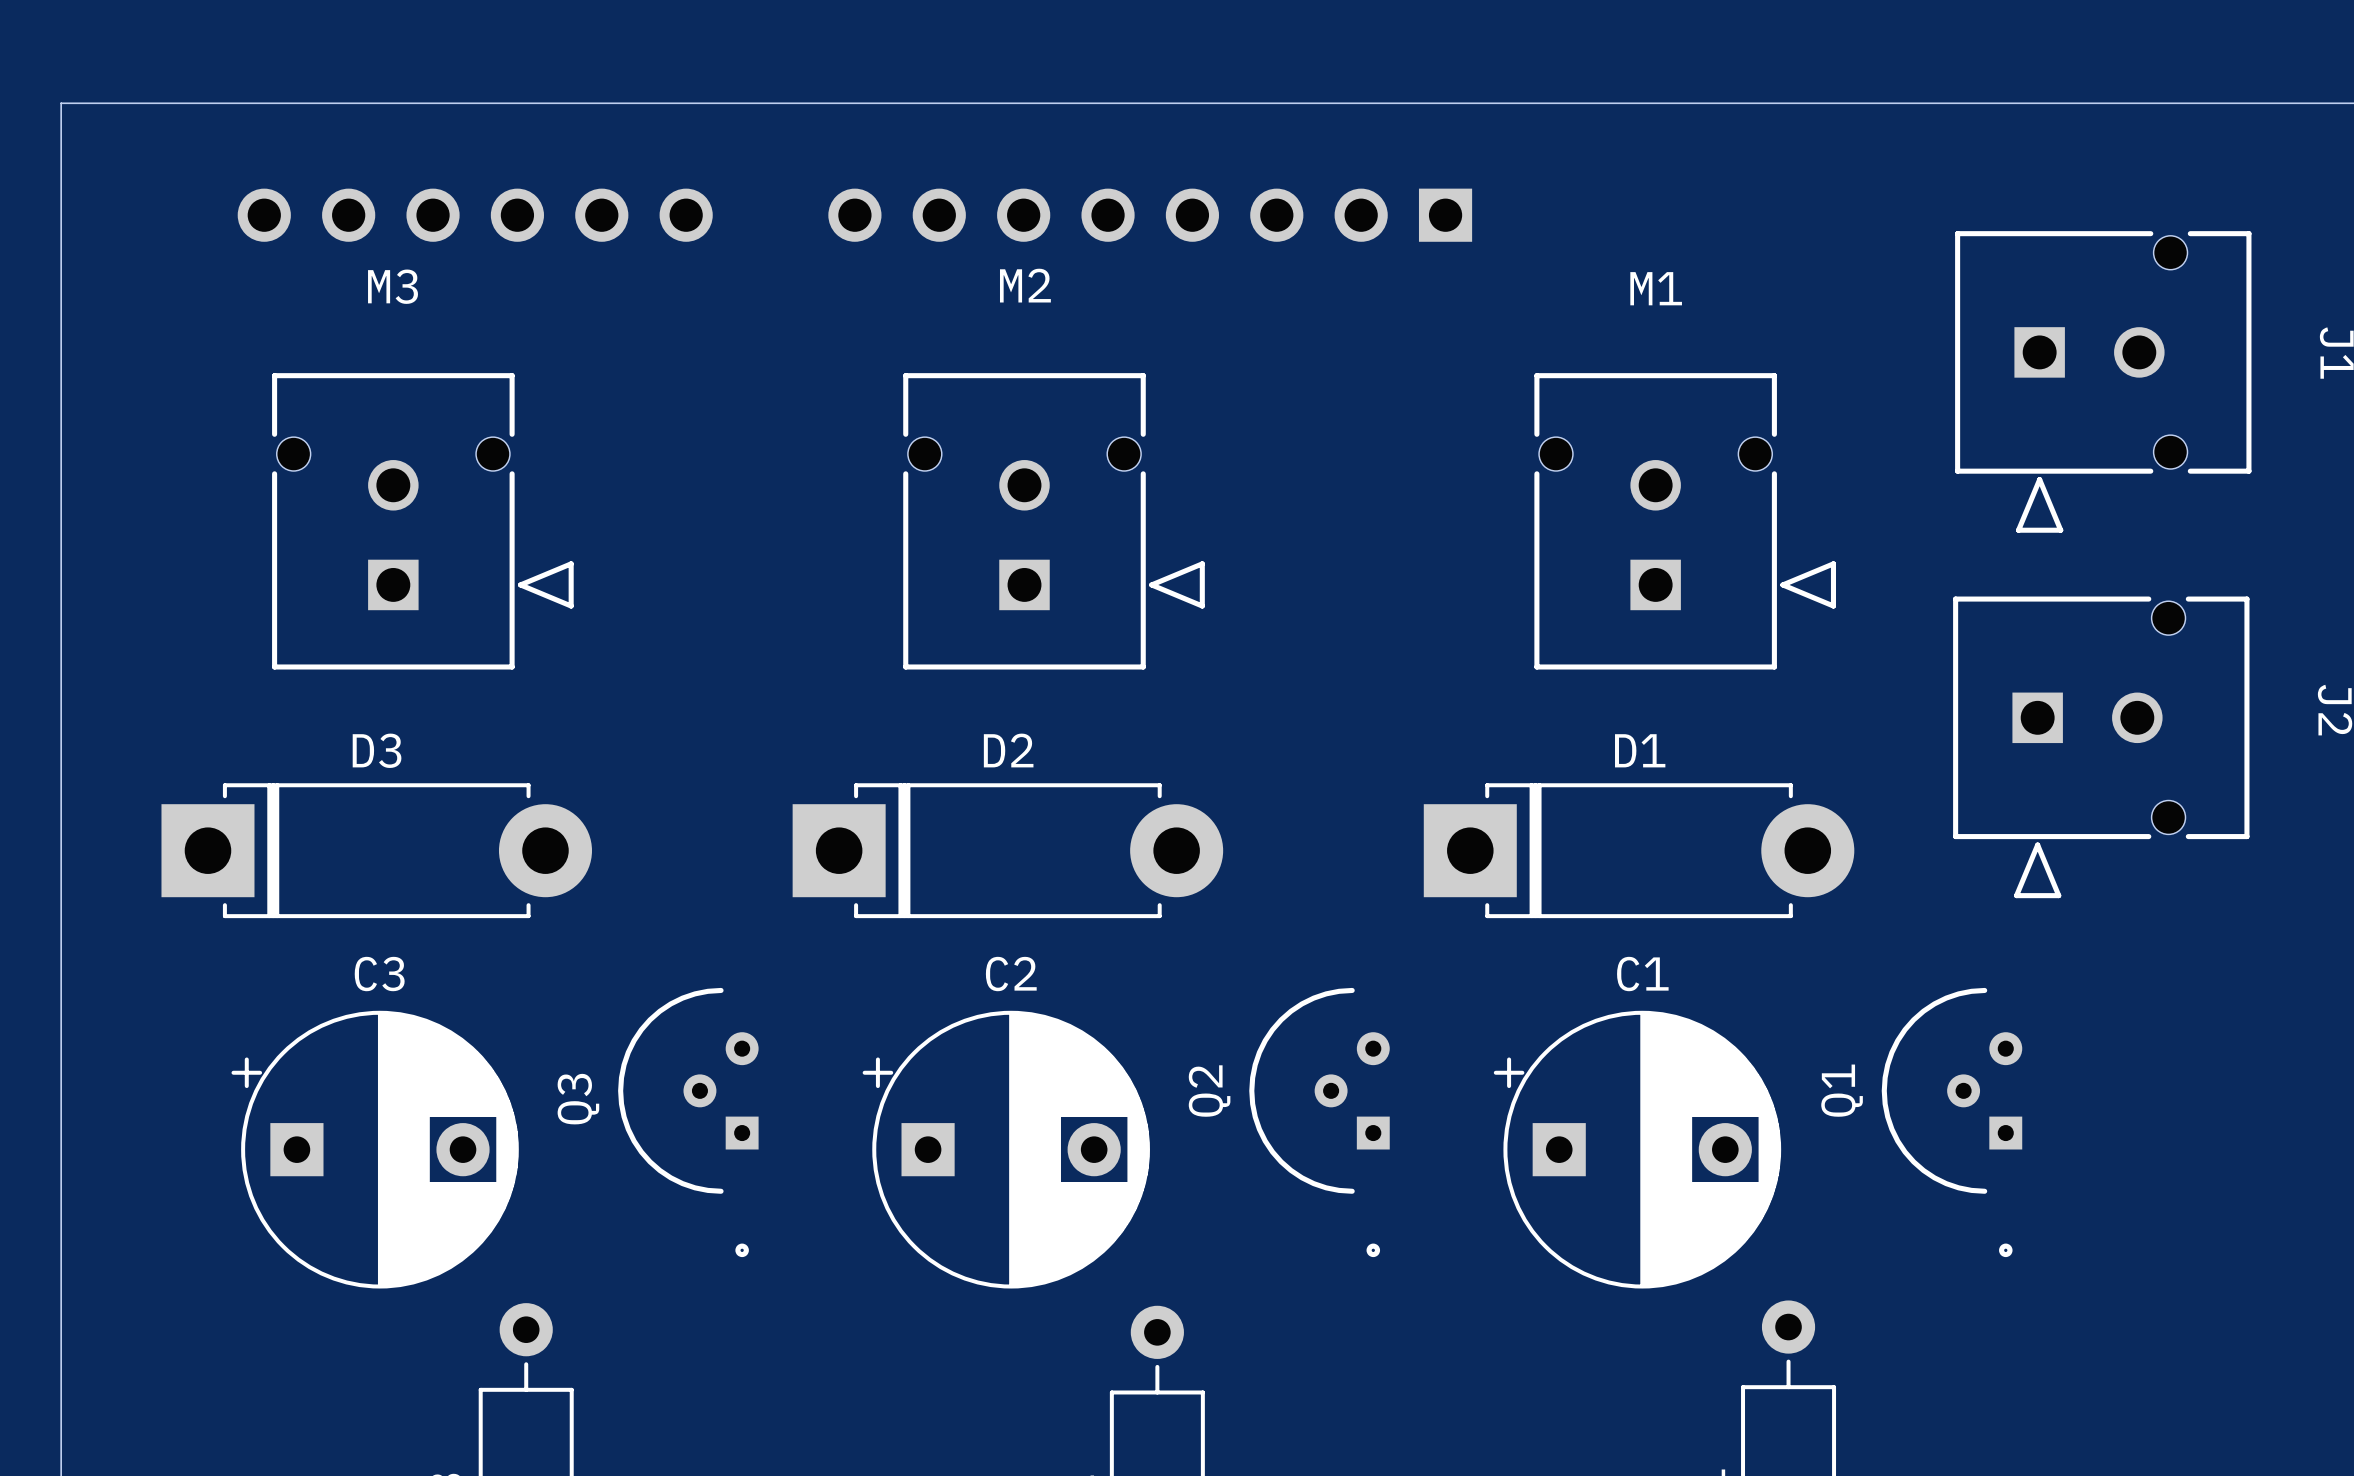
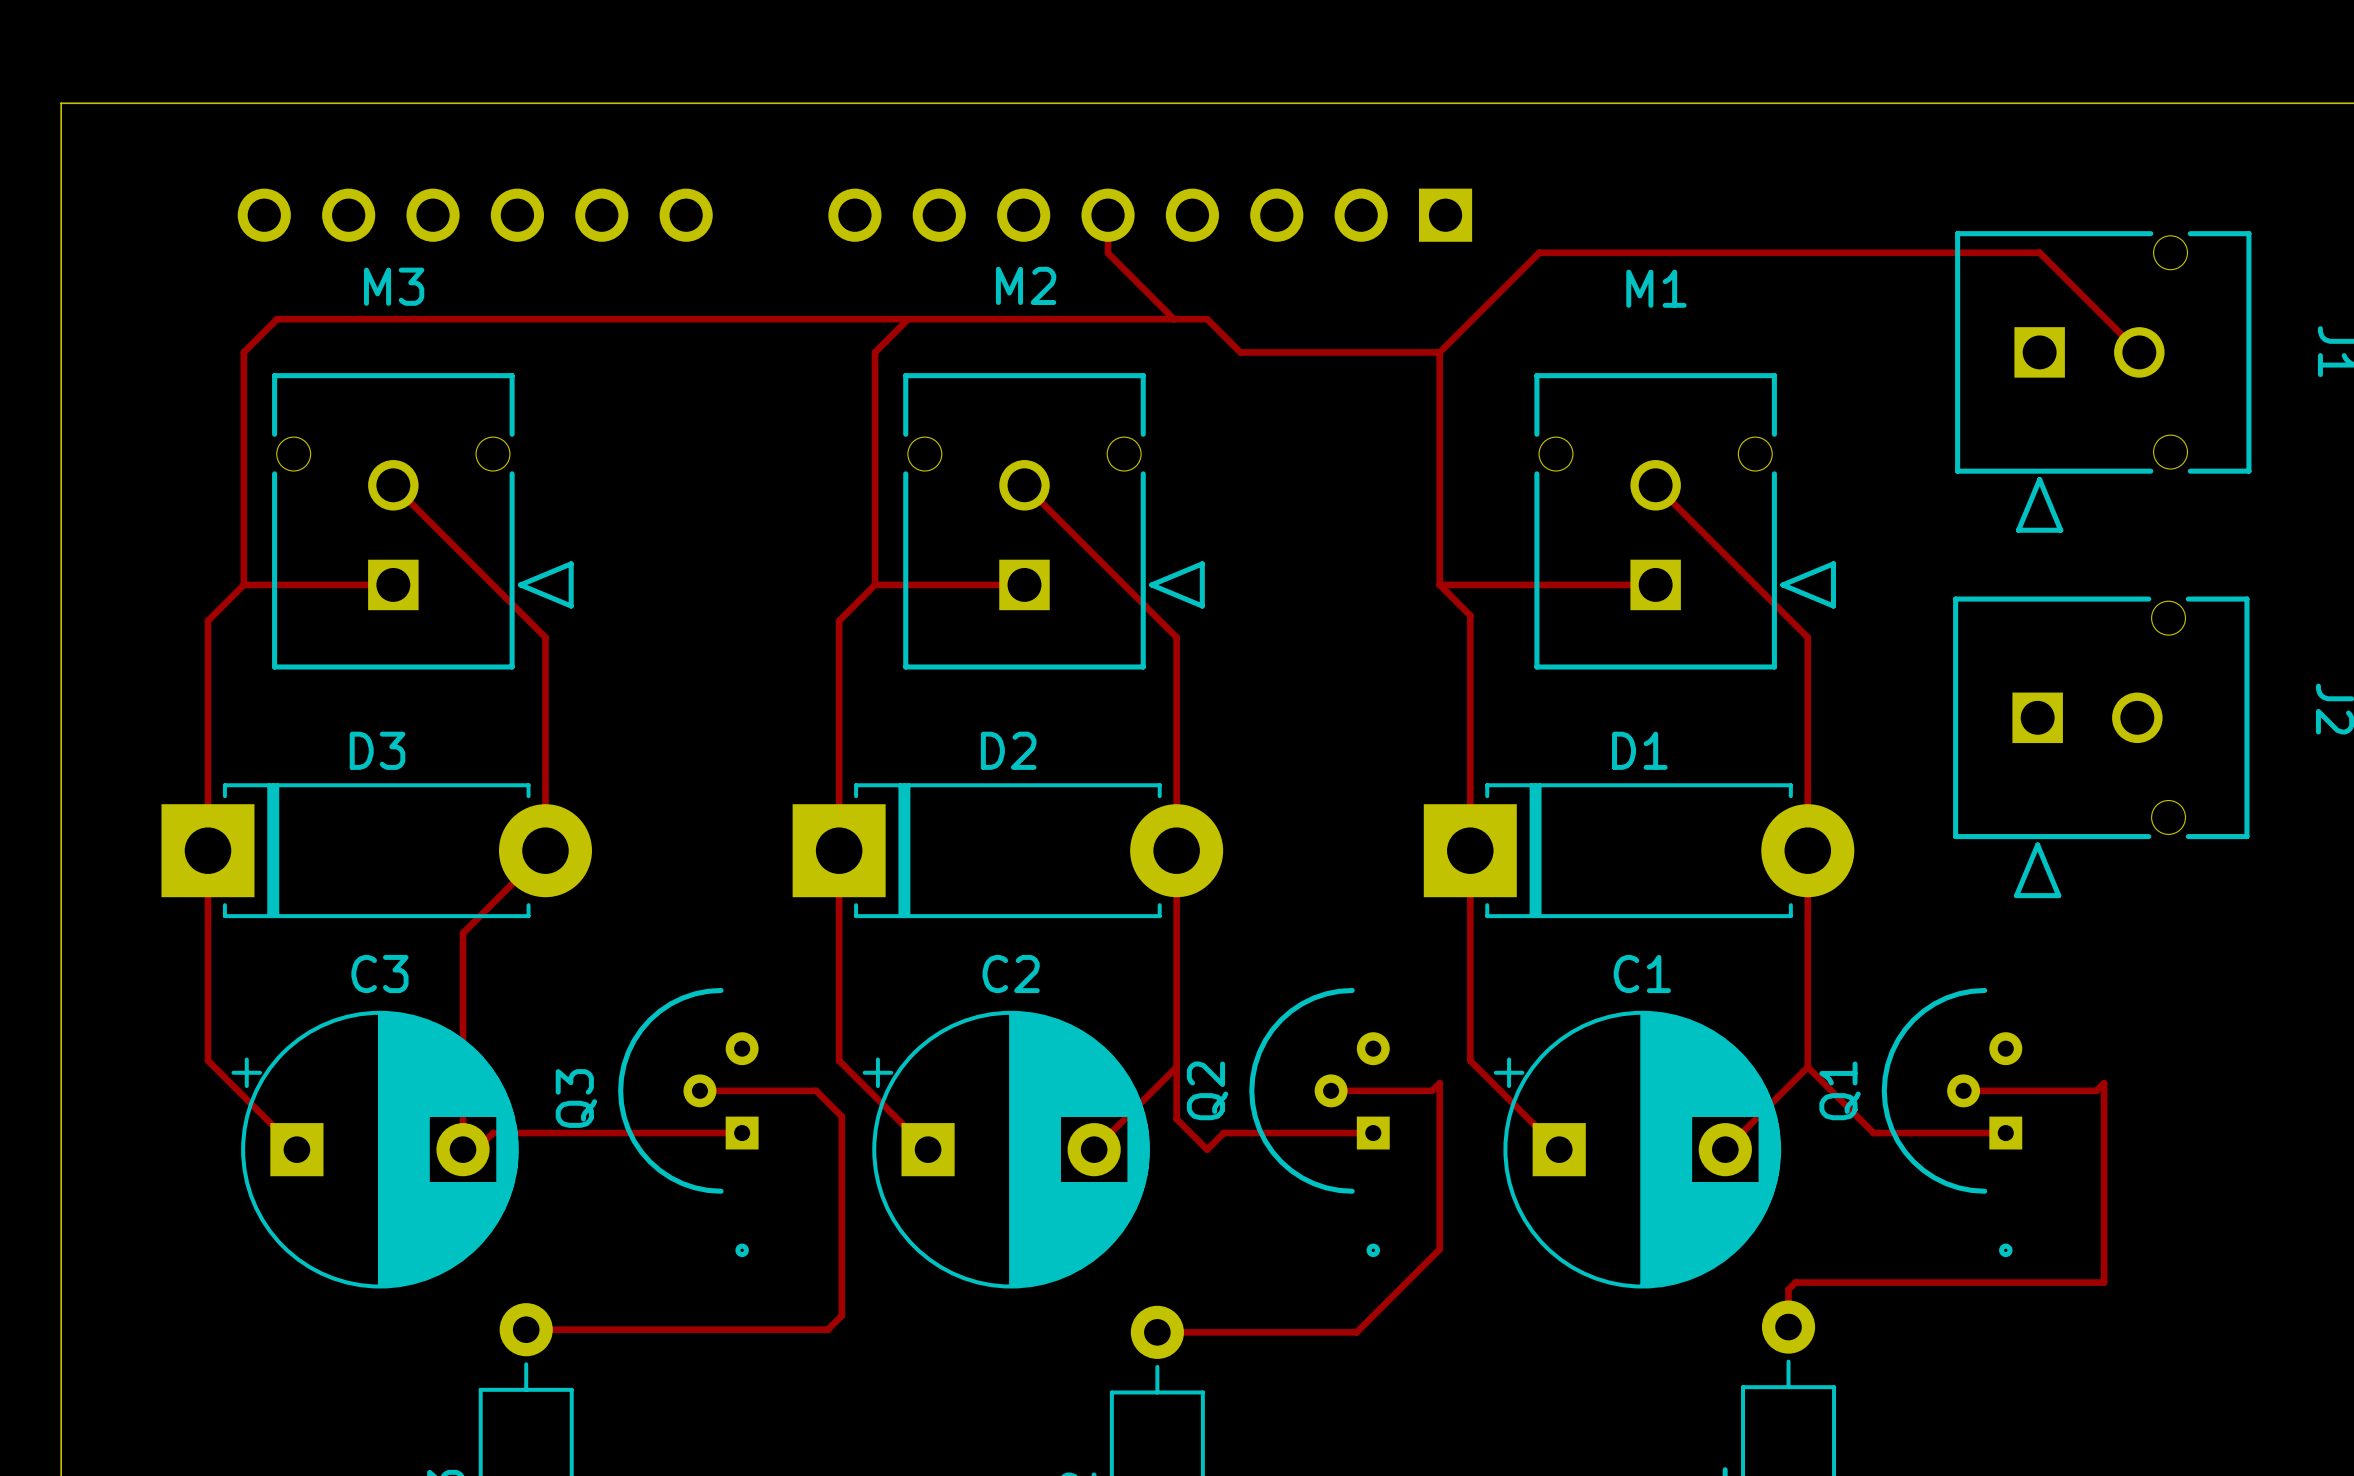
track: none -> (1108, 215) (1108, 253) (1173, 319)
track: none -> (908, 319) (875, 352) (875, 584)
track: none -> (1439, 352) (1439, 584)
track: none -> (1439, 352) (1240, 352) (1207, 319) (277, 319) (243, 352) (243, 584)
track: none -> (1439, 352) (1539, 252) (2039, 252) (2139, 352)
track: none -> (393, 485) (545, 637) (545, 850) (463, 933) (463, 1149) (476, 1149) (493, 1133) (742, 1133)
track: none -> (1024, 485) (1176, 637) (1176, 1119) (1207, 1149) (1223, 1133) (1373, 1133)
track: none -> (1672, 485) (1655, 485) (1807, 637) (1807, 1067)
track: none -> (243, 584) (393, 584)
track: none -> (243, 584) (207, 620) (207, 1060) (296, 1149)
track: none -> (875, 584) (839, 620) (839, 1060) (928, 1149)
track: none -> (875, 584) (1024, 584)
track: none -> (1439, 584) (1470, 615) (1470, 1060) (1559, 1149)
track: none -> (1439, 584) (1655, 584)
track: none -> (1176, 1067) (1094, 1149)
track: none -> (1807, 1067) (1725, 1149)
track: none -> (1807, 1067) (1873, 1133) (2005, 1133)
track: none -> (699, 1090) (816, 1090) (841, 1116) (841, 1315) (827, 1329) (526, 1329)
track: none -> (1331, 1090) (1432, 1090) (1439, 1083) (1439, 1249) (1356, 1332) (1157, 1332)
track: none -> (1963, 1090) (2096, 1090) (2104, 1083) (2104, 1282) (1795, 1282) (1788, 1289) (1788, 1327)

